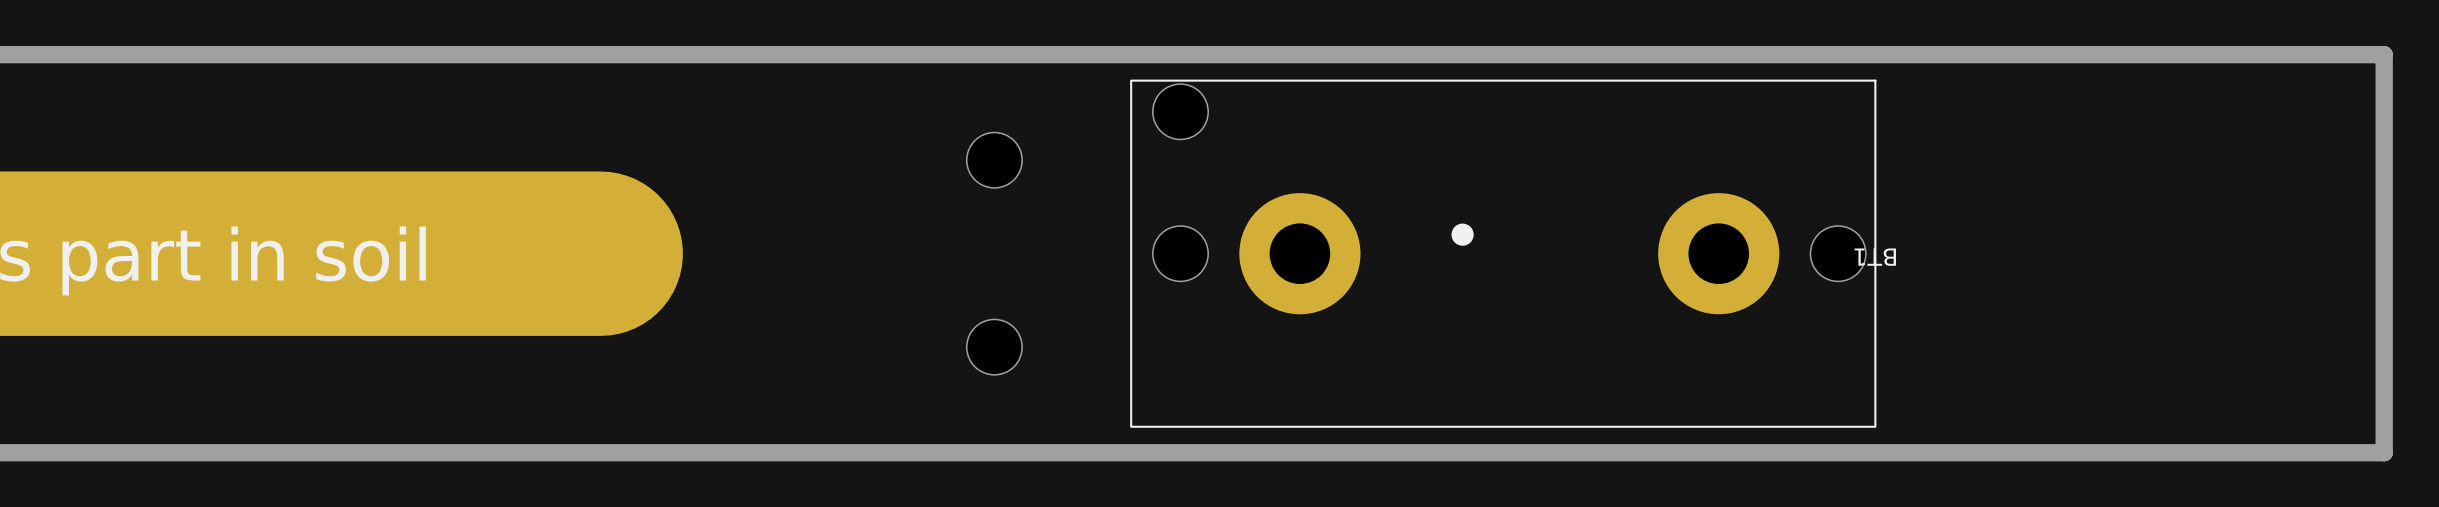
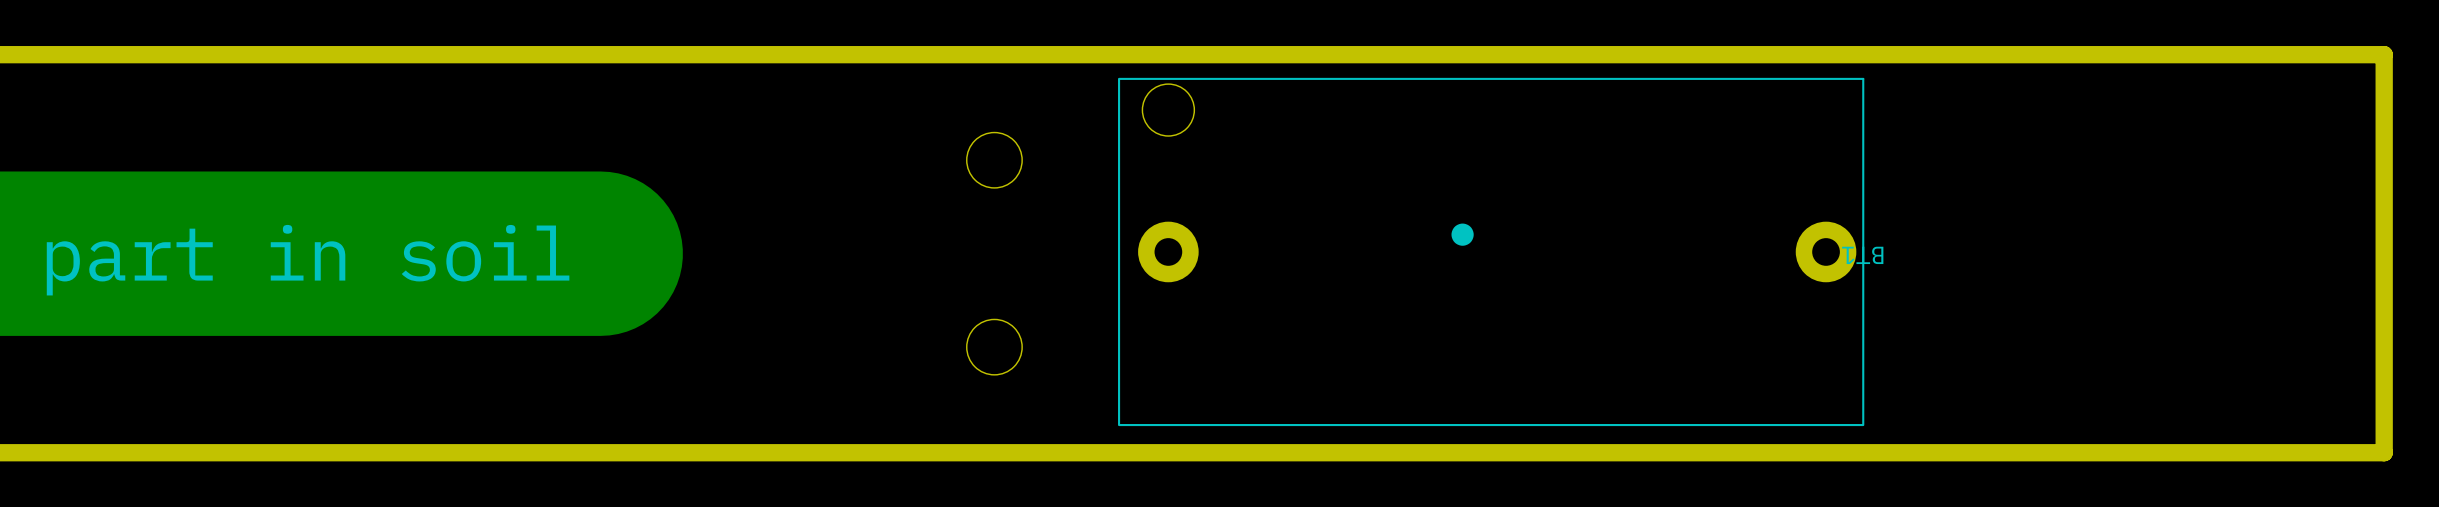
BT1 footprint: [1130, 79, 1877, 428] -> [1118, 77, 1865, 427]

